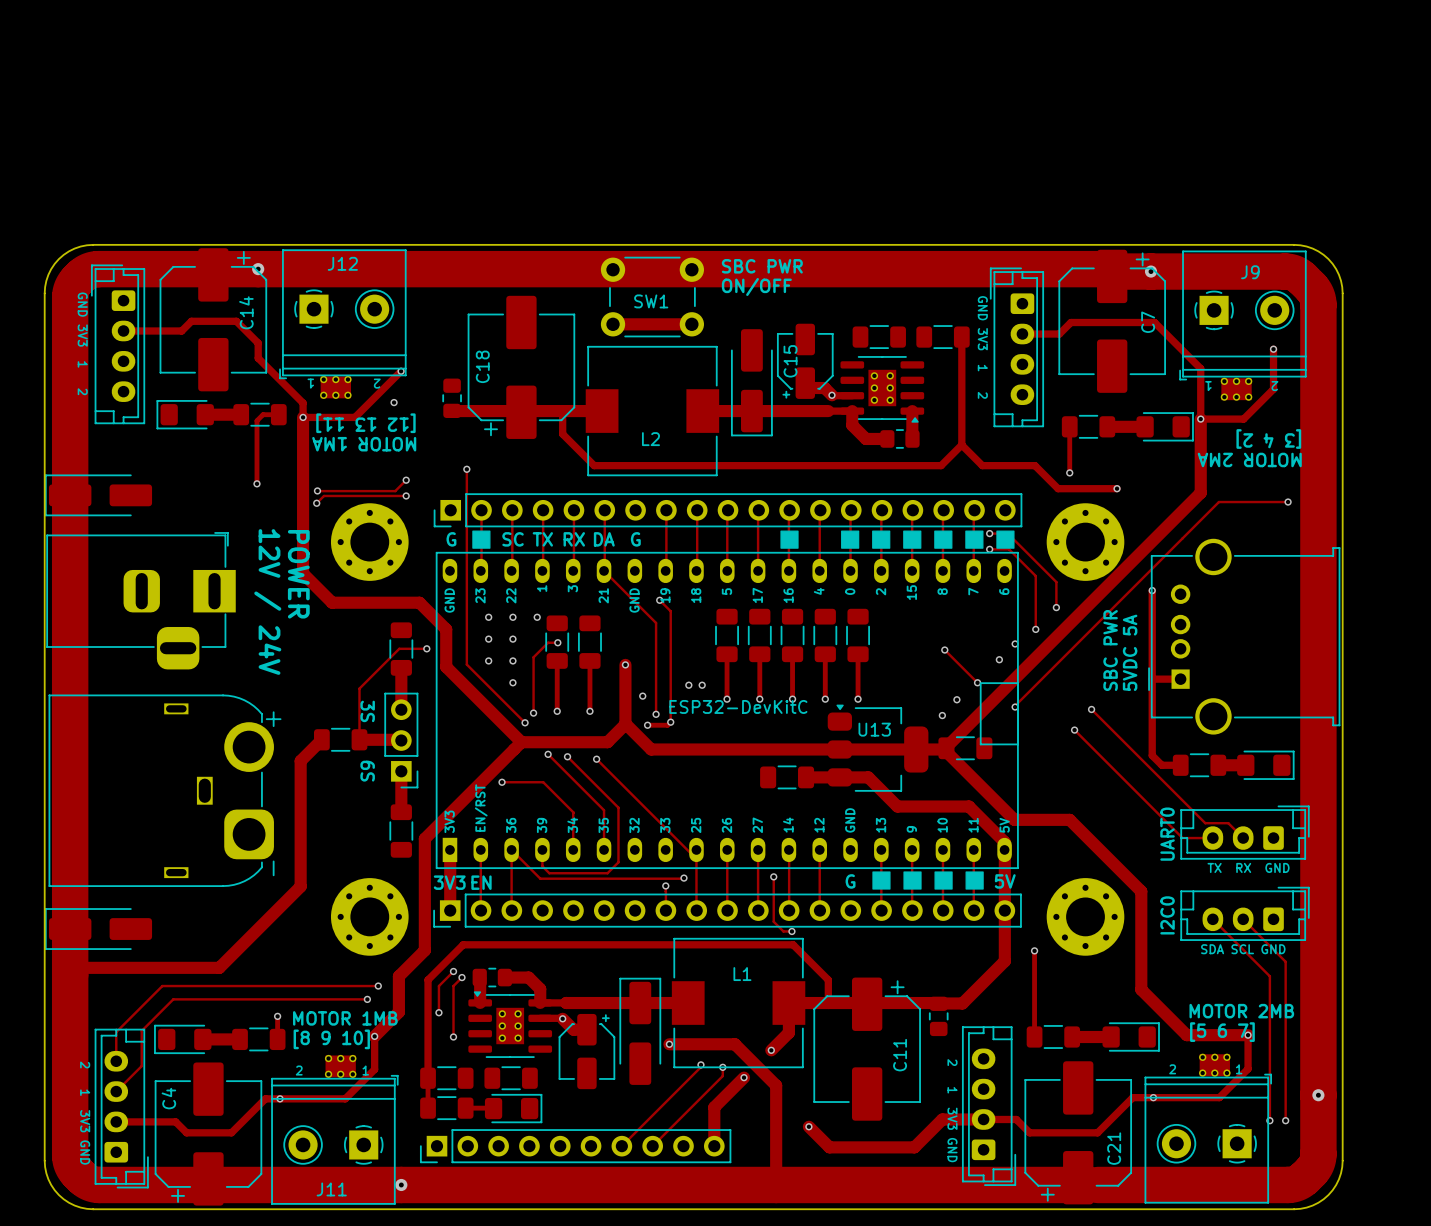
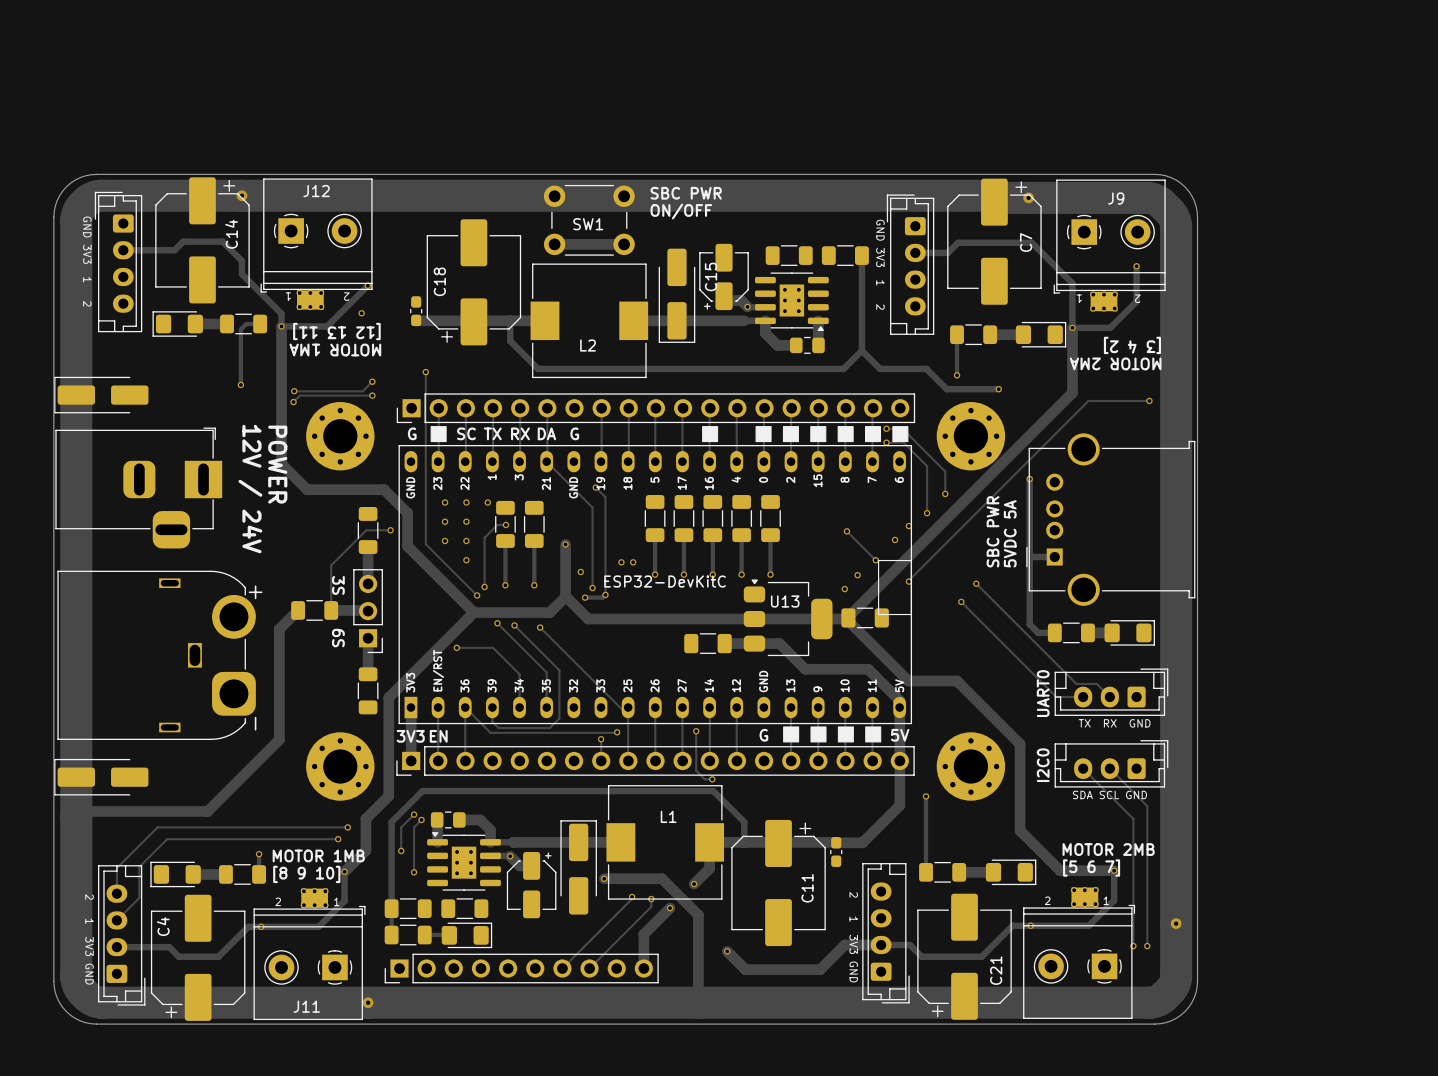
part footprint: [442, 378, 462, 418] -> [410, 296, 423, 327]
part footprint: [929, 996, 949, 1037] -> [830, 837, 843, 867]

